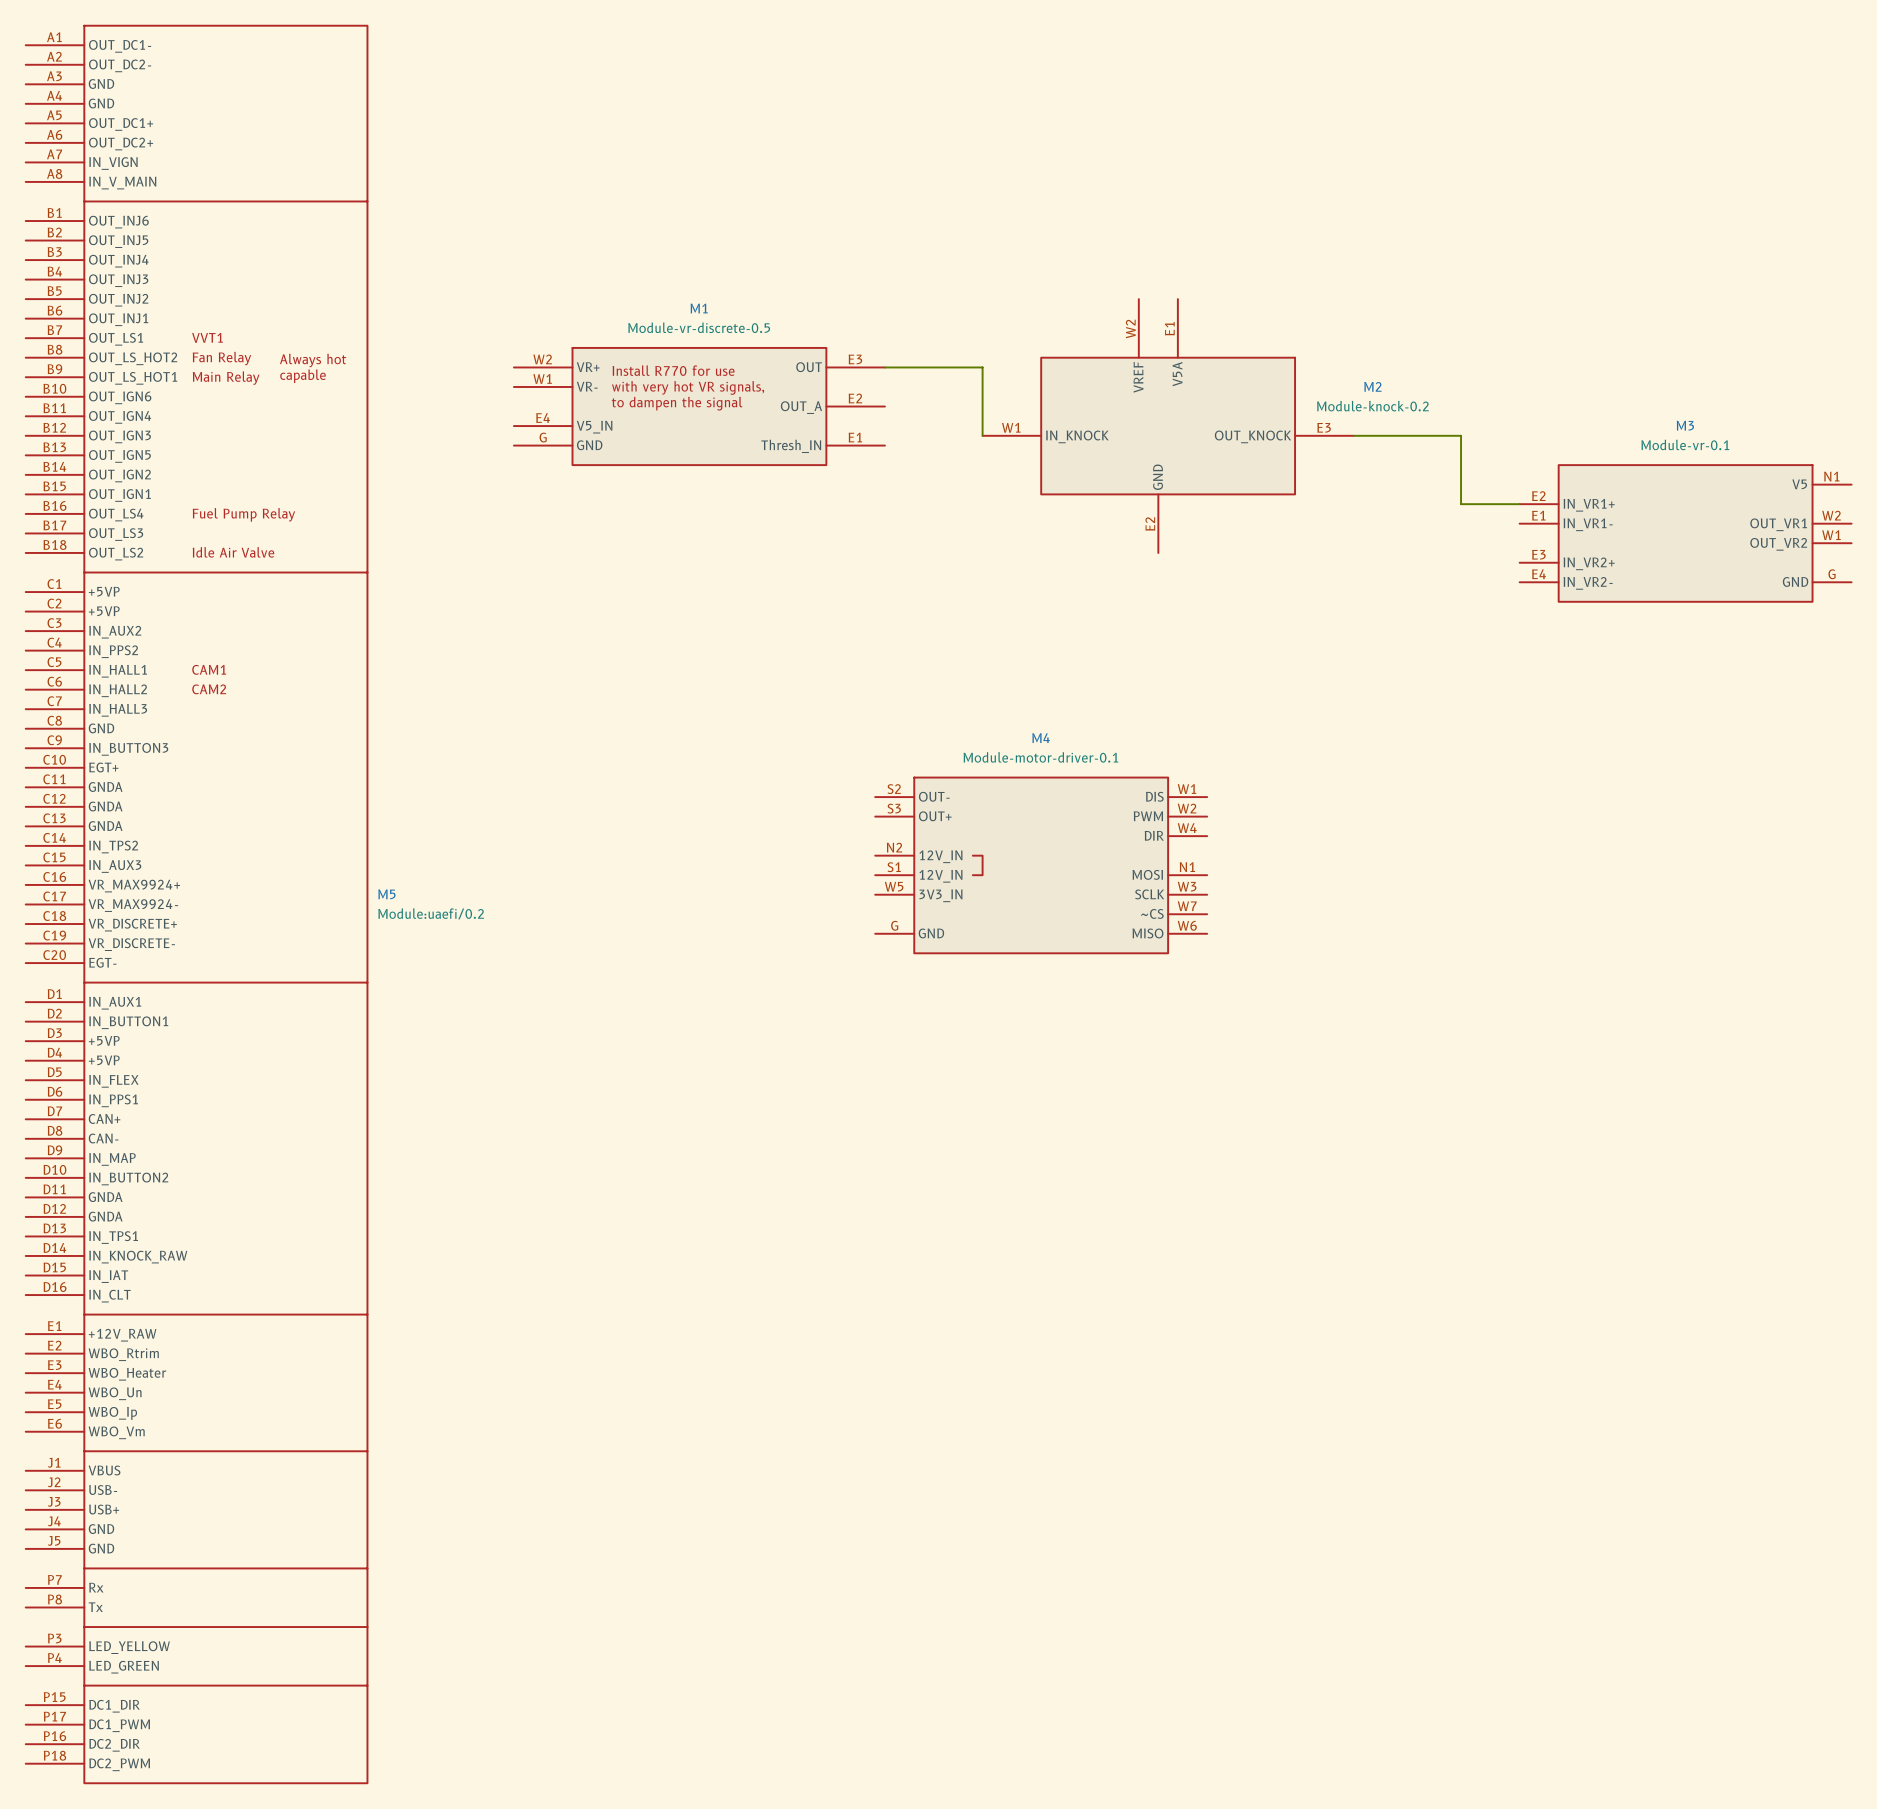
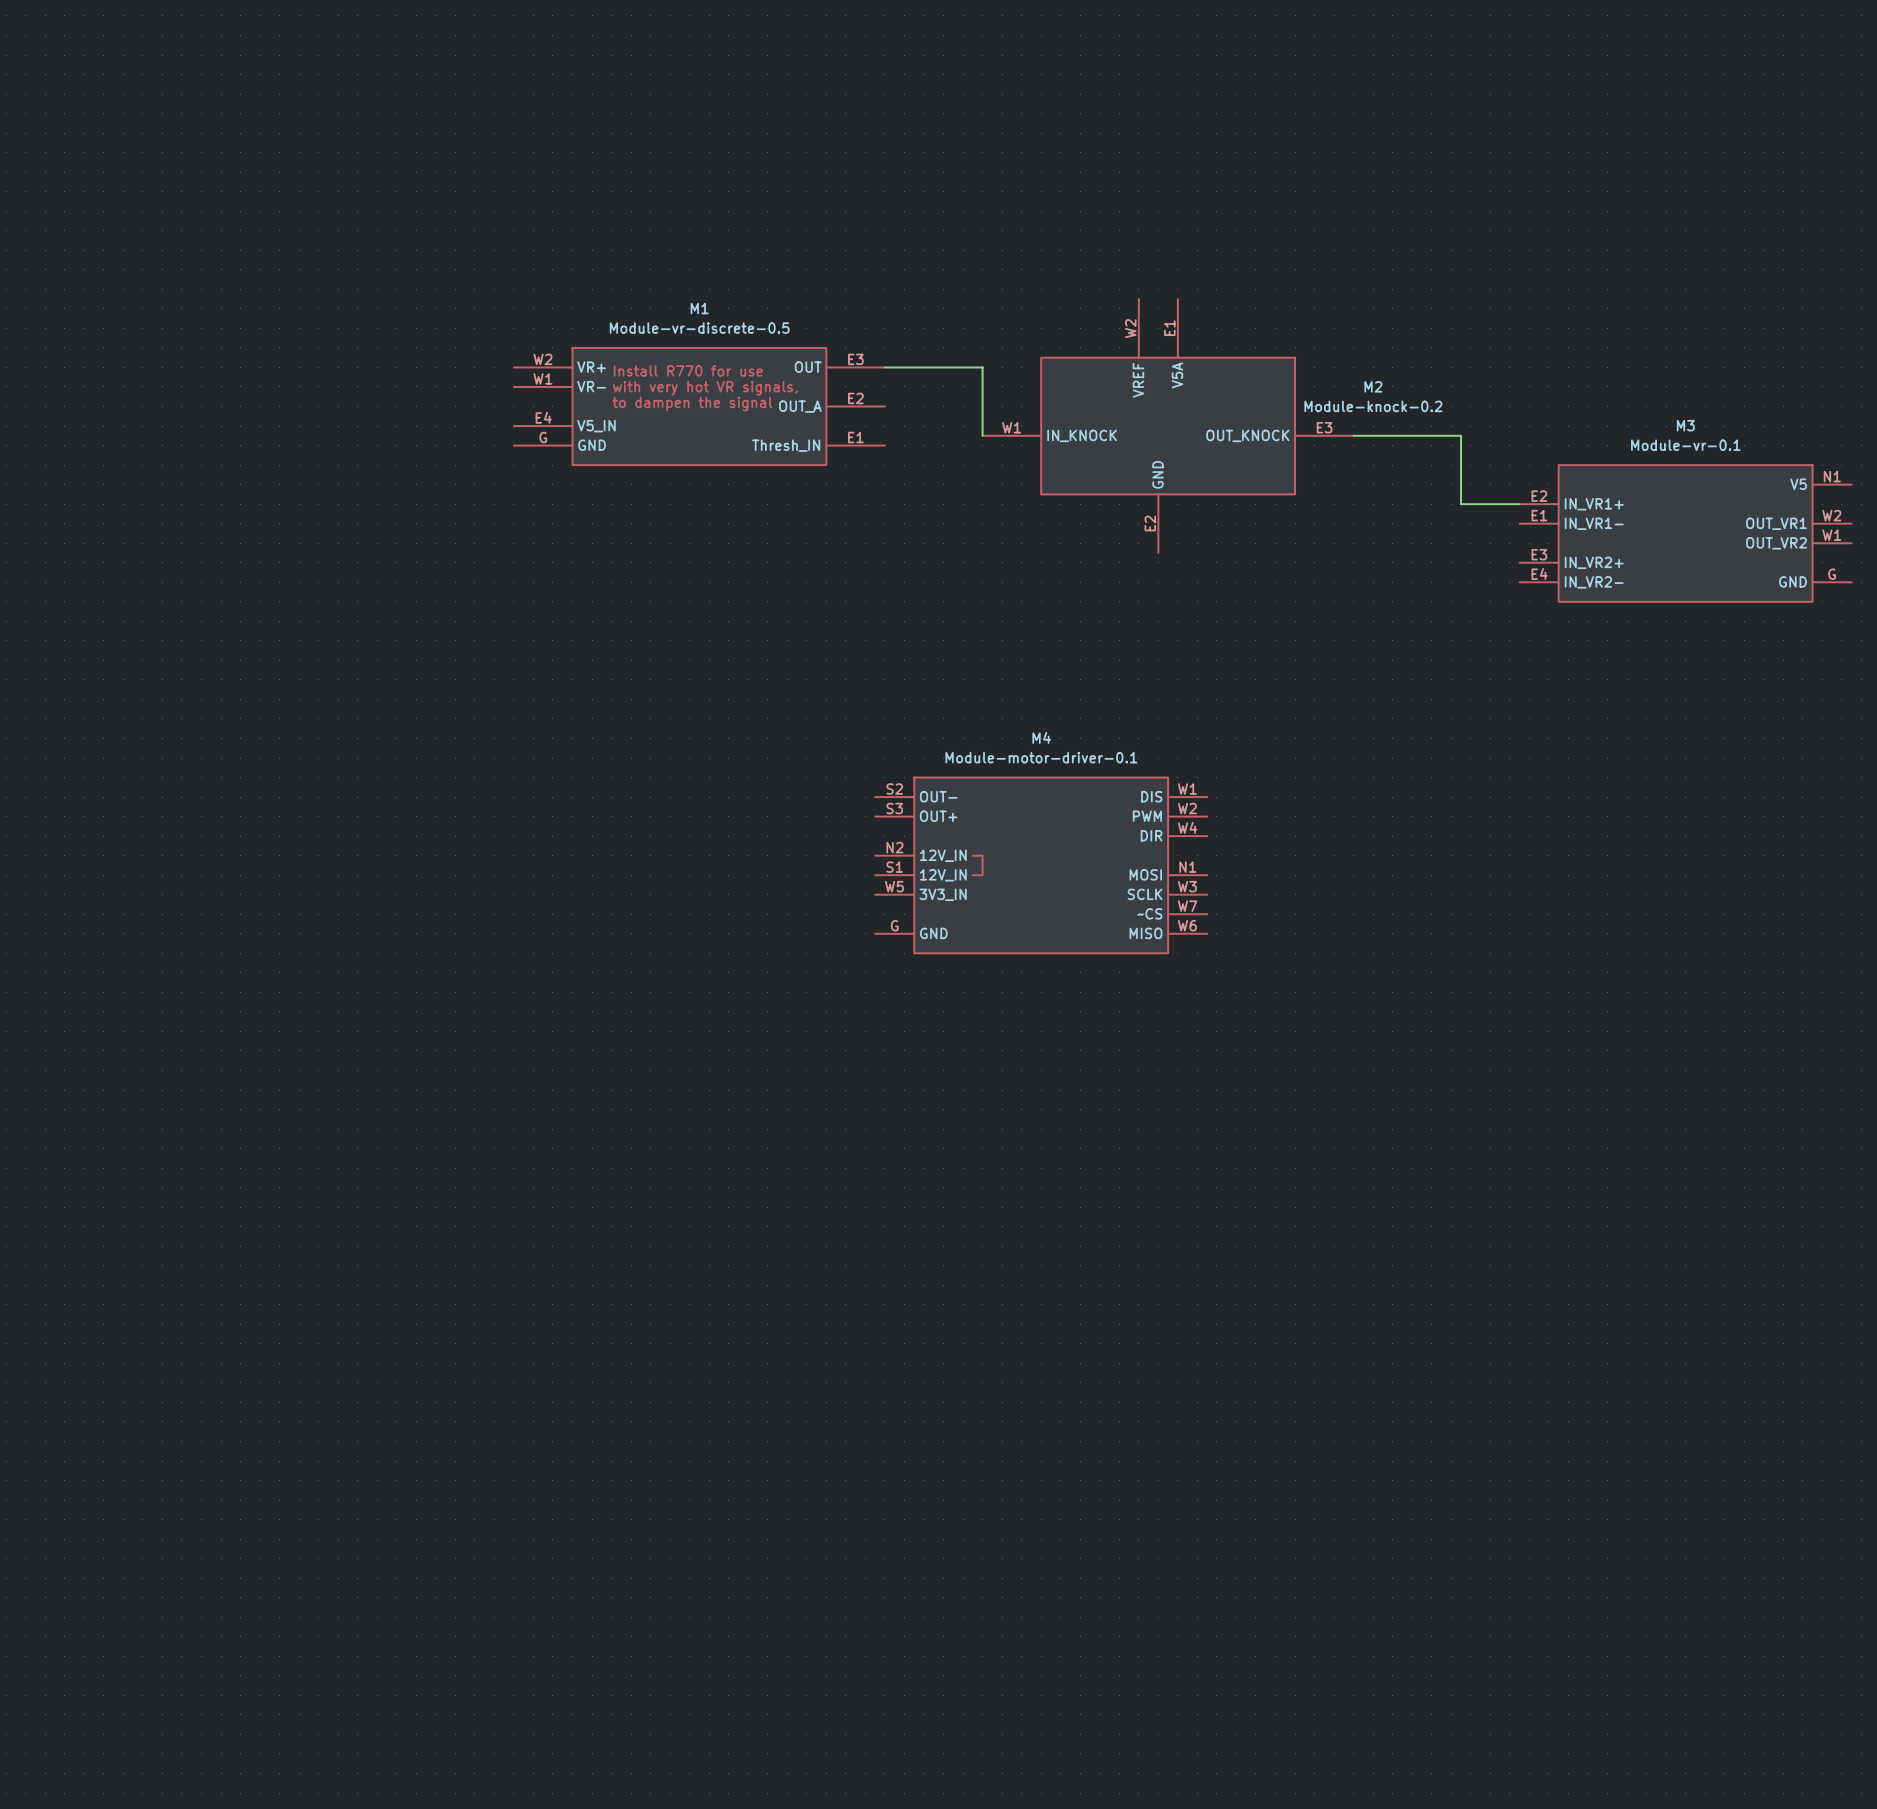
M5: Module:uaefi/0.2 (196, 904) -> none

